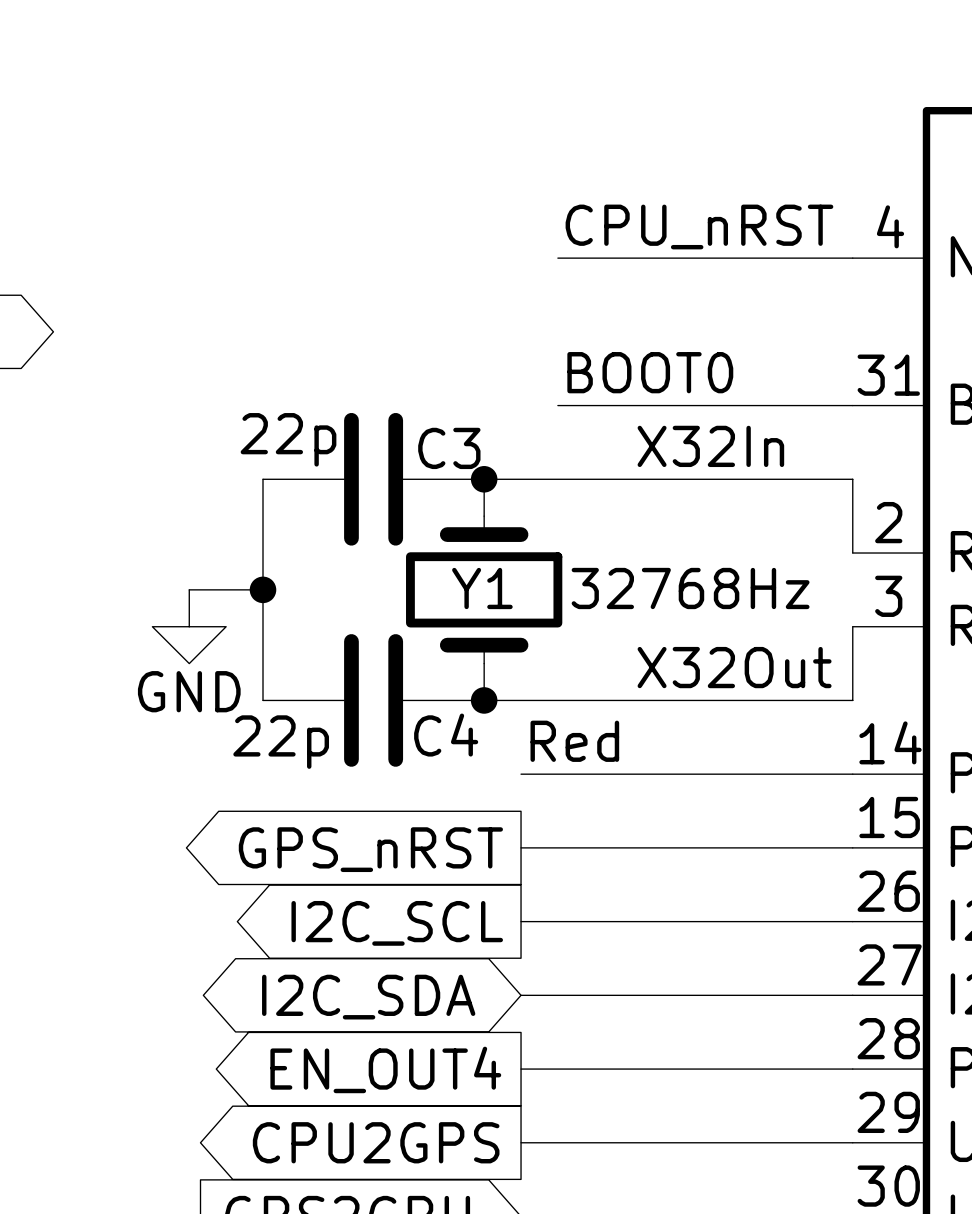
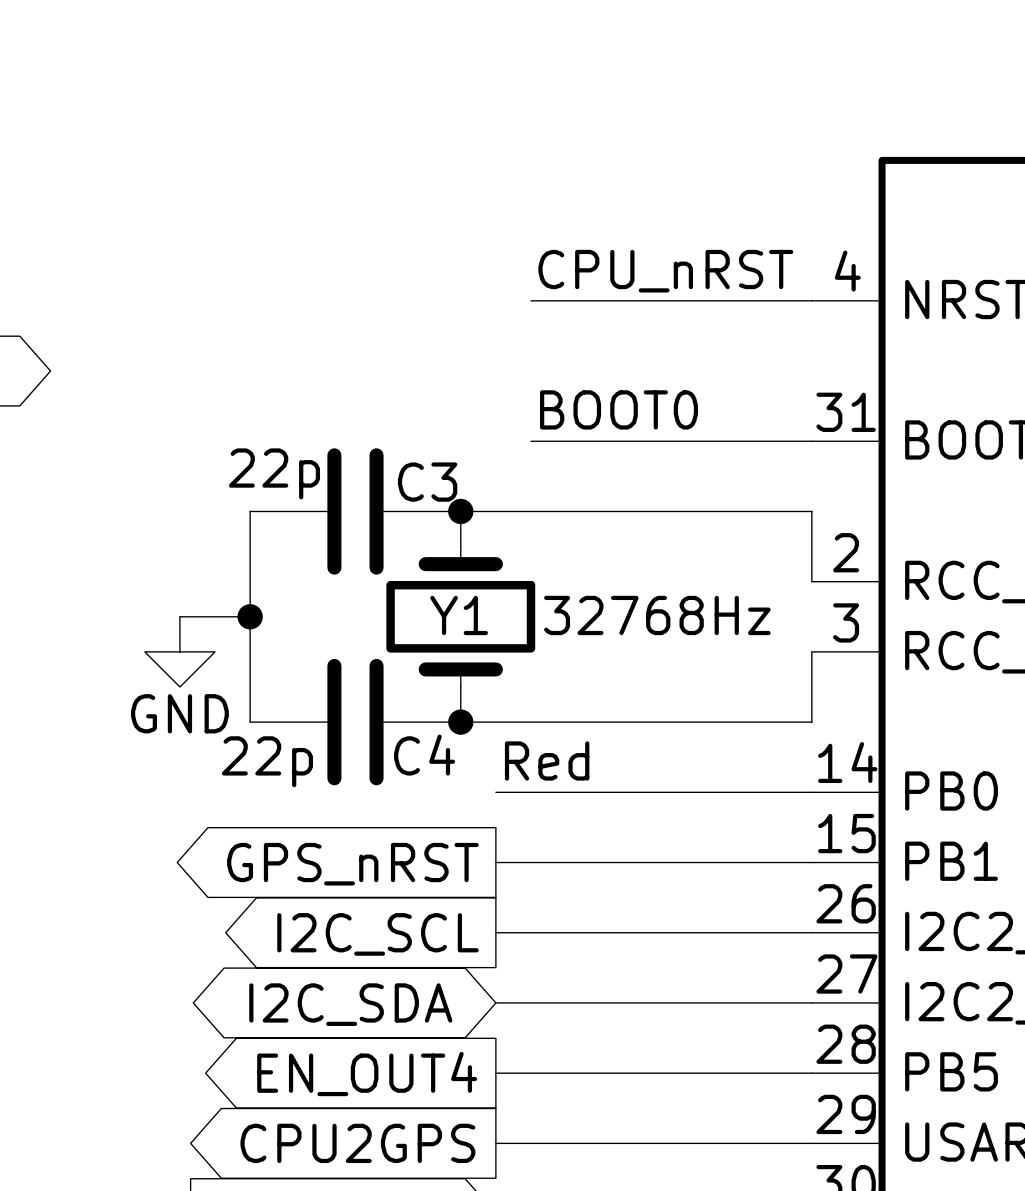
label: X32In (710, 446) -> none
label: X32Out (734, 667) -> none

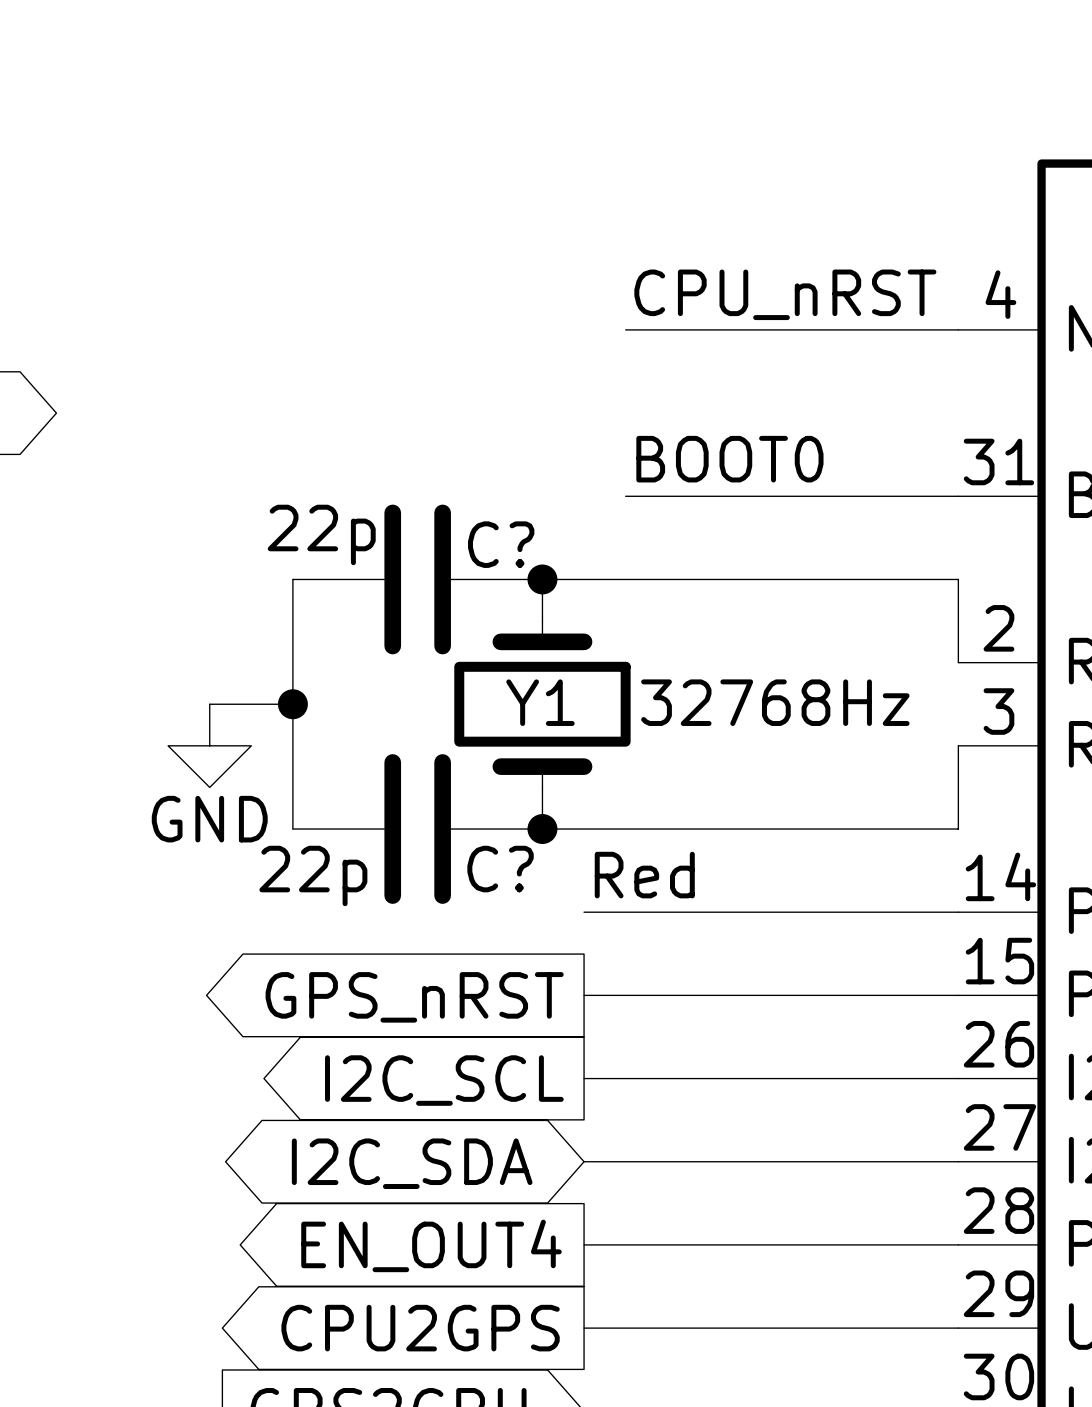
C3 name: C3 (427, 482) -> C? (501, 544)
C4 name: C4 (424, 755) -> C? (500, 869)

